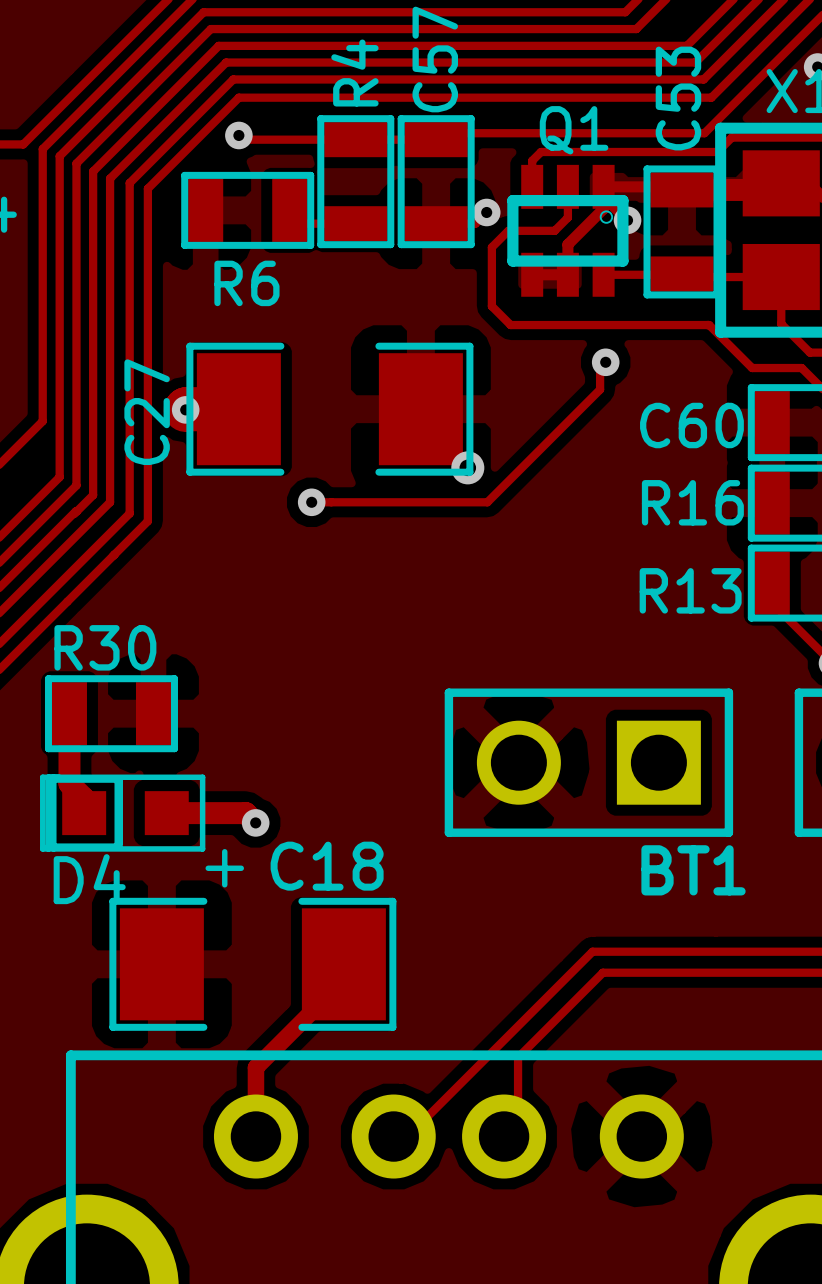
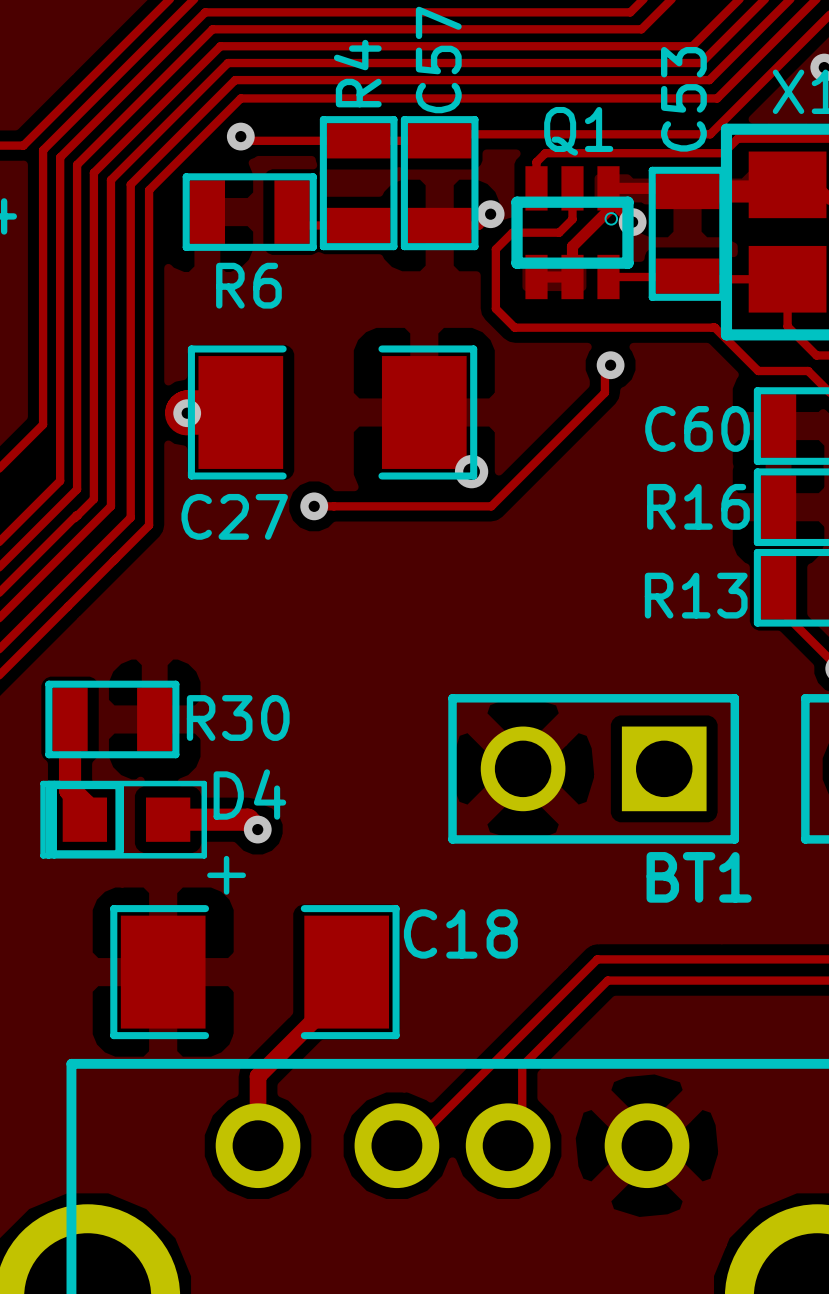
C27 name rotation: 0° (147, 412) -> 90° clockwise (234, 516)
R30 name position: R30 (105, 647) -> R30 (238, 717)
C18 name position: C18 (327, 866) -> C18 (460, 933)
D4 name position: D4 (89, 879) -> D4 (249, 794)

